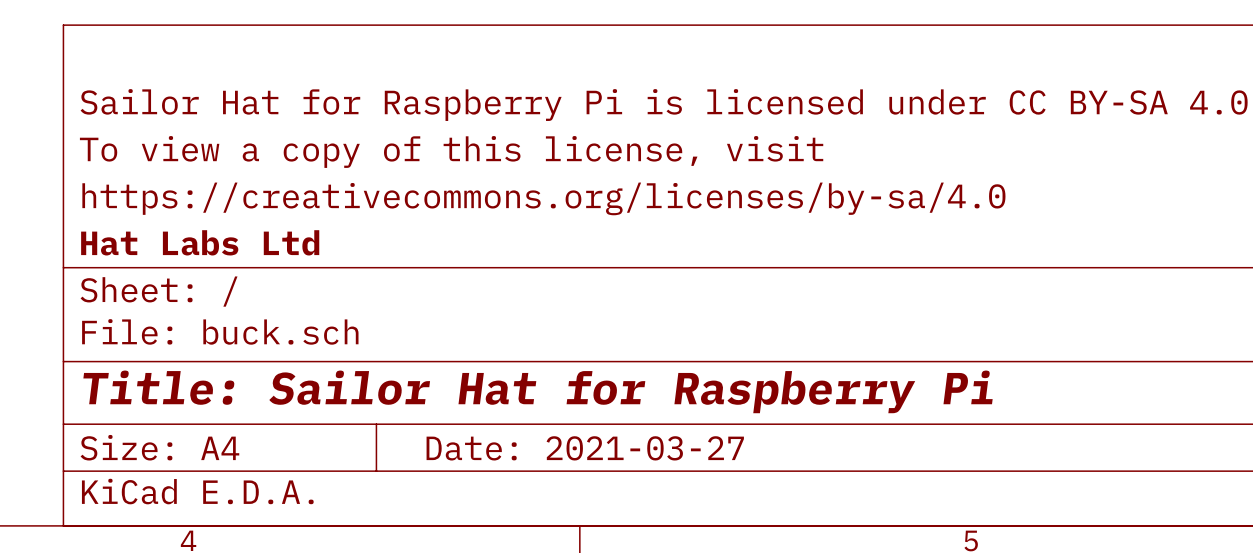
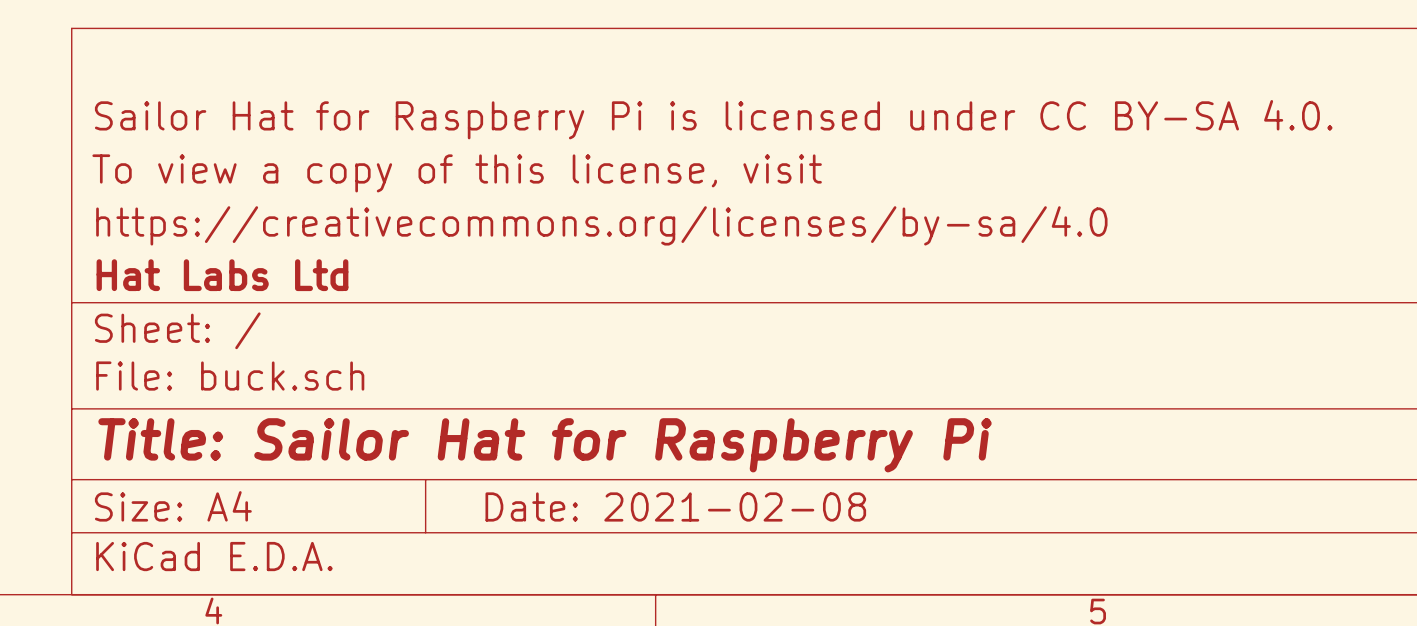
title block: Date: 2021-03-27 (585, 448) -> Date: 2021-02-08 (675, 506)

